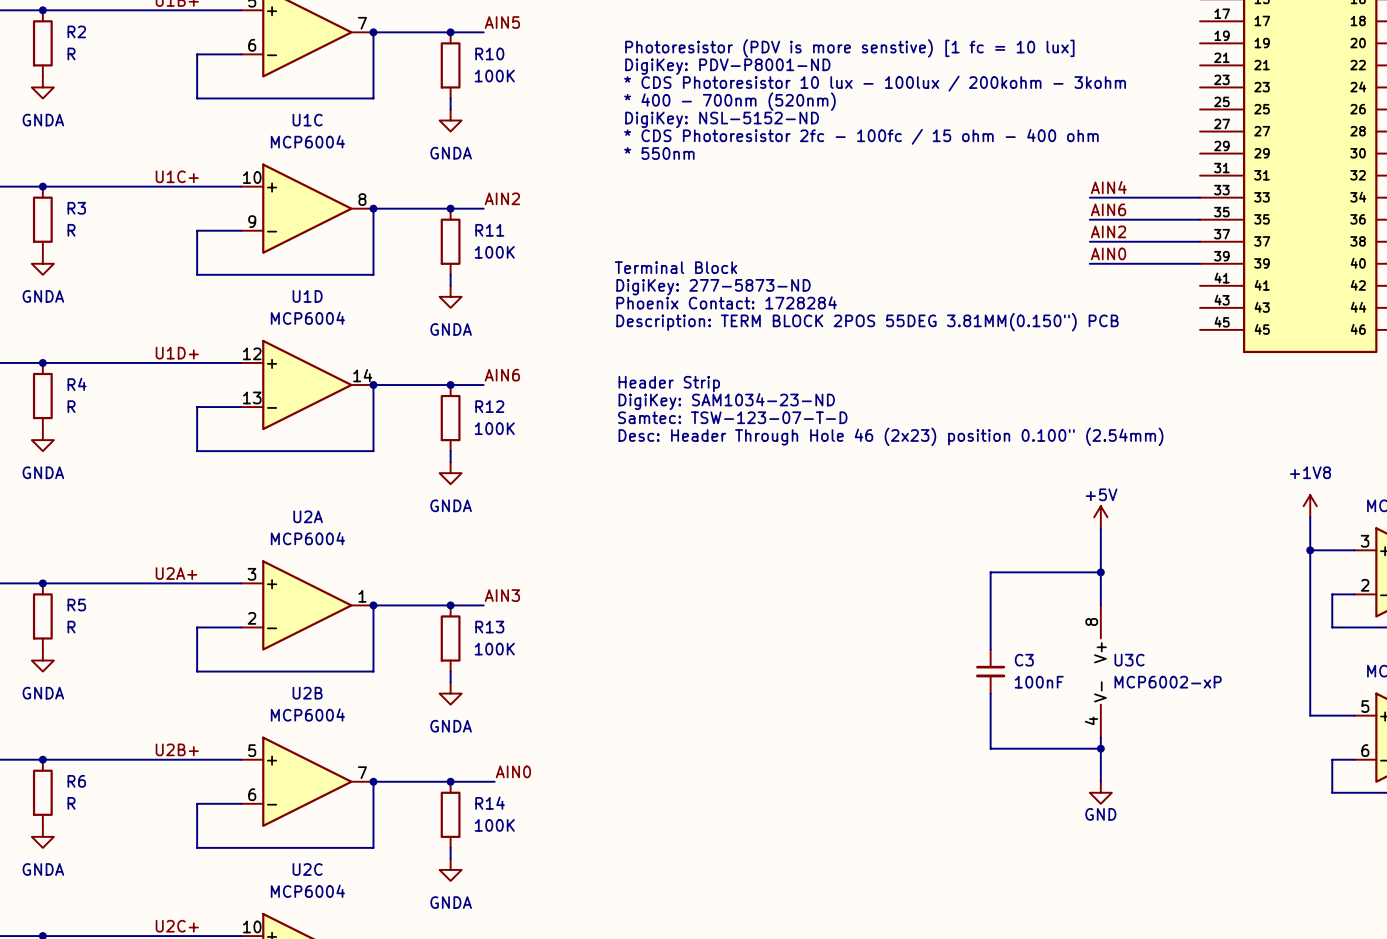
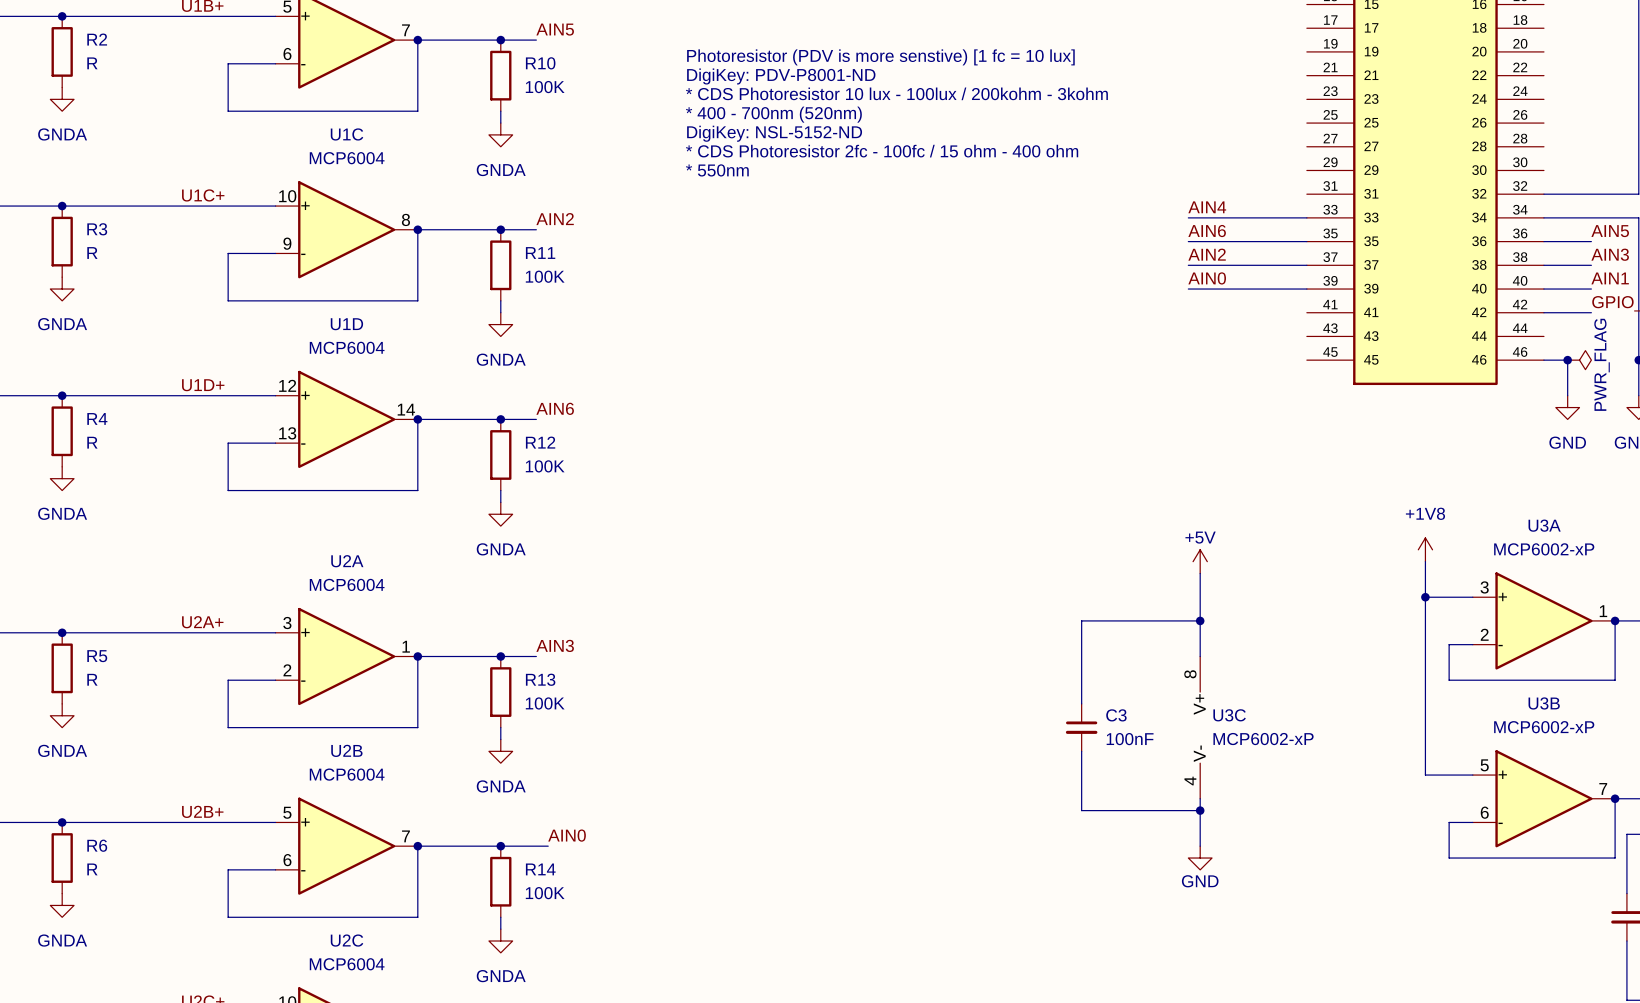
text: Terminal Block (675, 267) -> none
text: DigiKey: 277-5873-ND (713, 287) -> none
text: Phoenix Contact: 1728284 (726, 302) -> none
text: Description: TERM BLOCK 2POS 55DEG 3.81MM(0.150") PCB (867, 322) -> none
text: Header Strip (669, 384) -> none
text: DigiKey: SAM1034-23-ND (726, 401) -> none
text: Samtec: TSW-123-07-T-D (732, 417) -> none
text: Desc: Header Through Hole 46 (2x23) position 0.100" (2.54mm) (891, 436) -> none

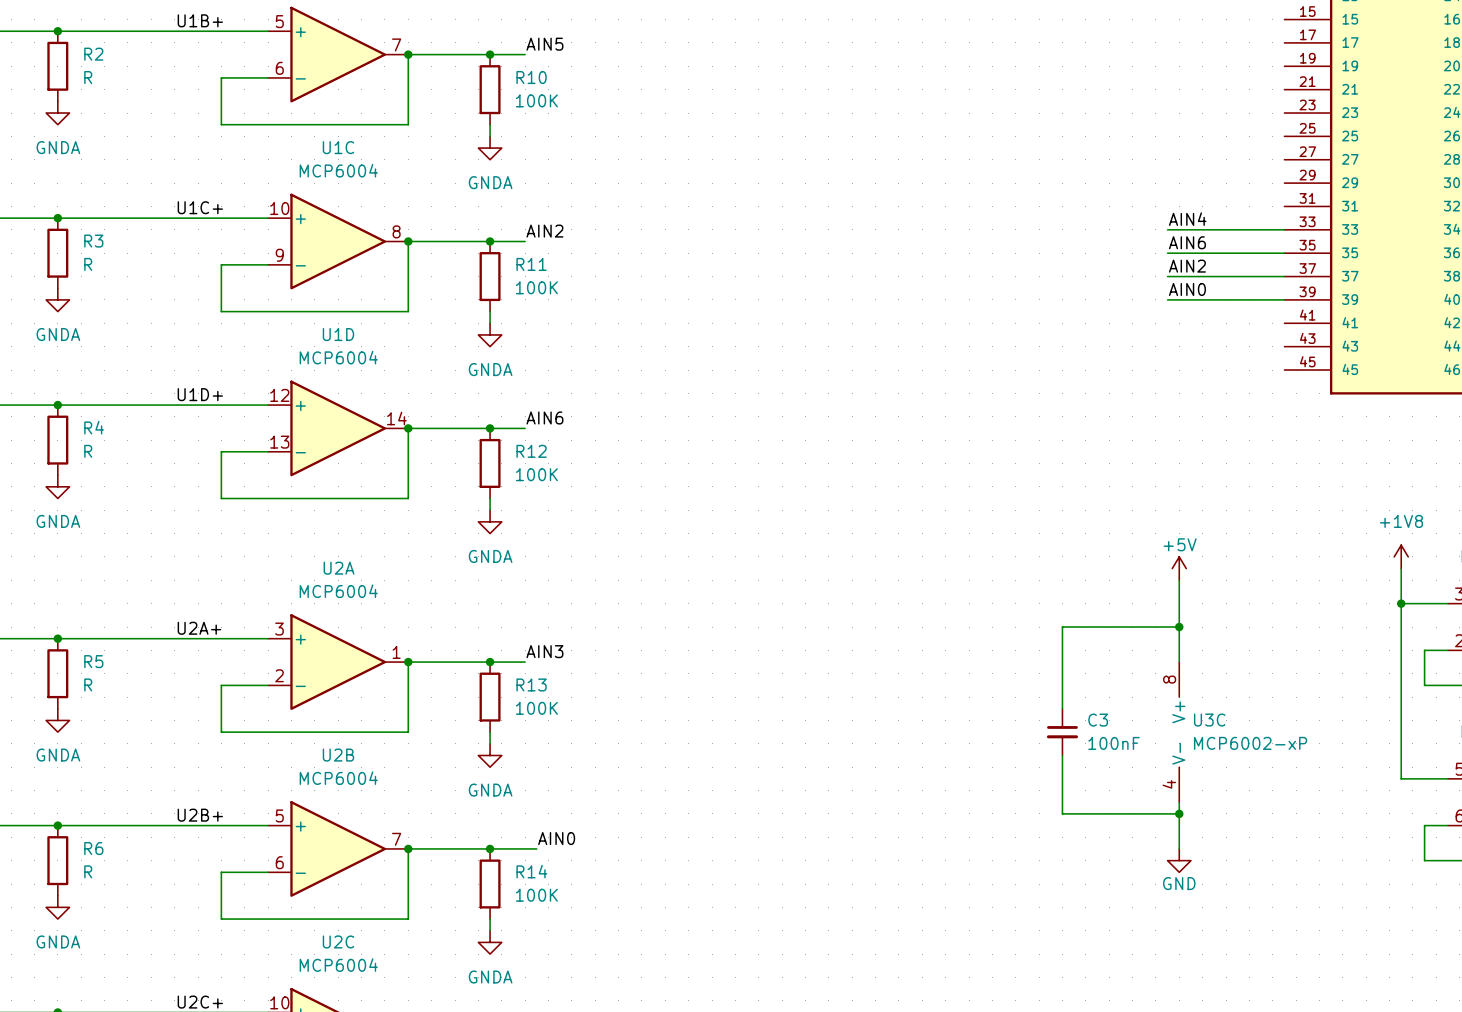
text: Photoresistor (PDV is more senstive) [1 fc = 10 lux] (880, 57) -> none
text: DigiKey: PDV-P8001-ND (781, 76) -> none
text: * CDS Photoresistor 10 lux - 100lux / 200kohm - 3kohm (896, 93) -> none
text: * 400 - 700nm (520nm) (773, 114) -> none
text: DigiKey: NSL-5152-ND (774, 133) -> none
text: * CDS Photoresistor 2fc - 100fc / 15 ohm - 400 ohm (882, 151) -> none
text: * 550nm (717, 170) -> none

